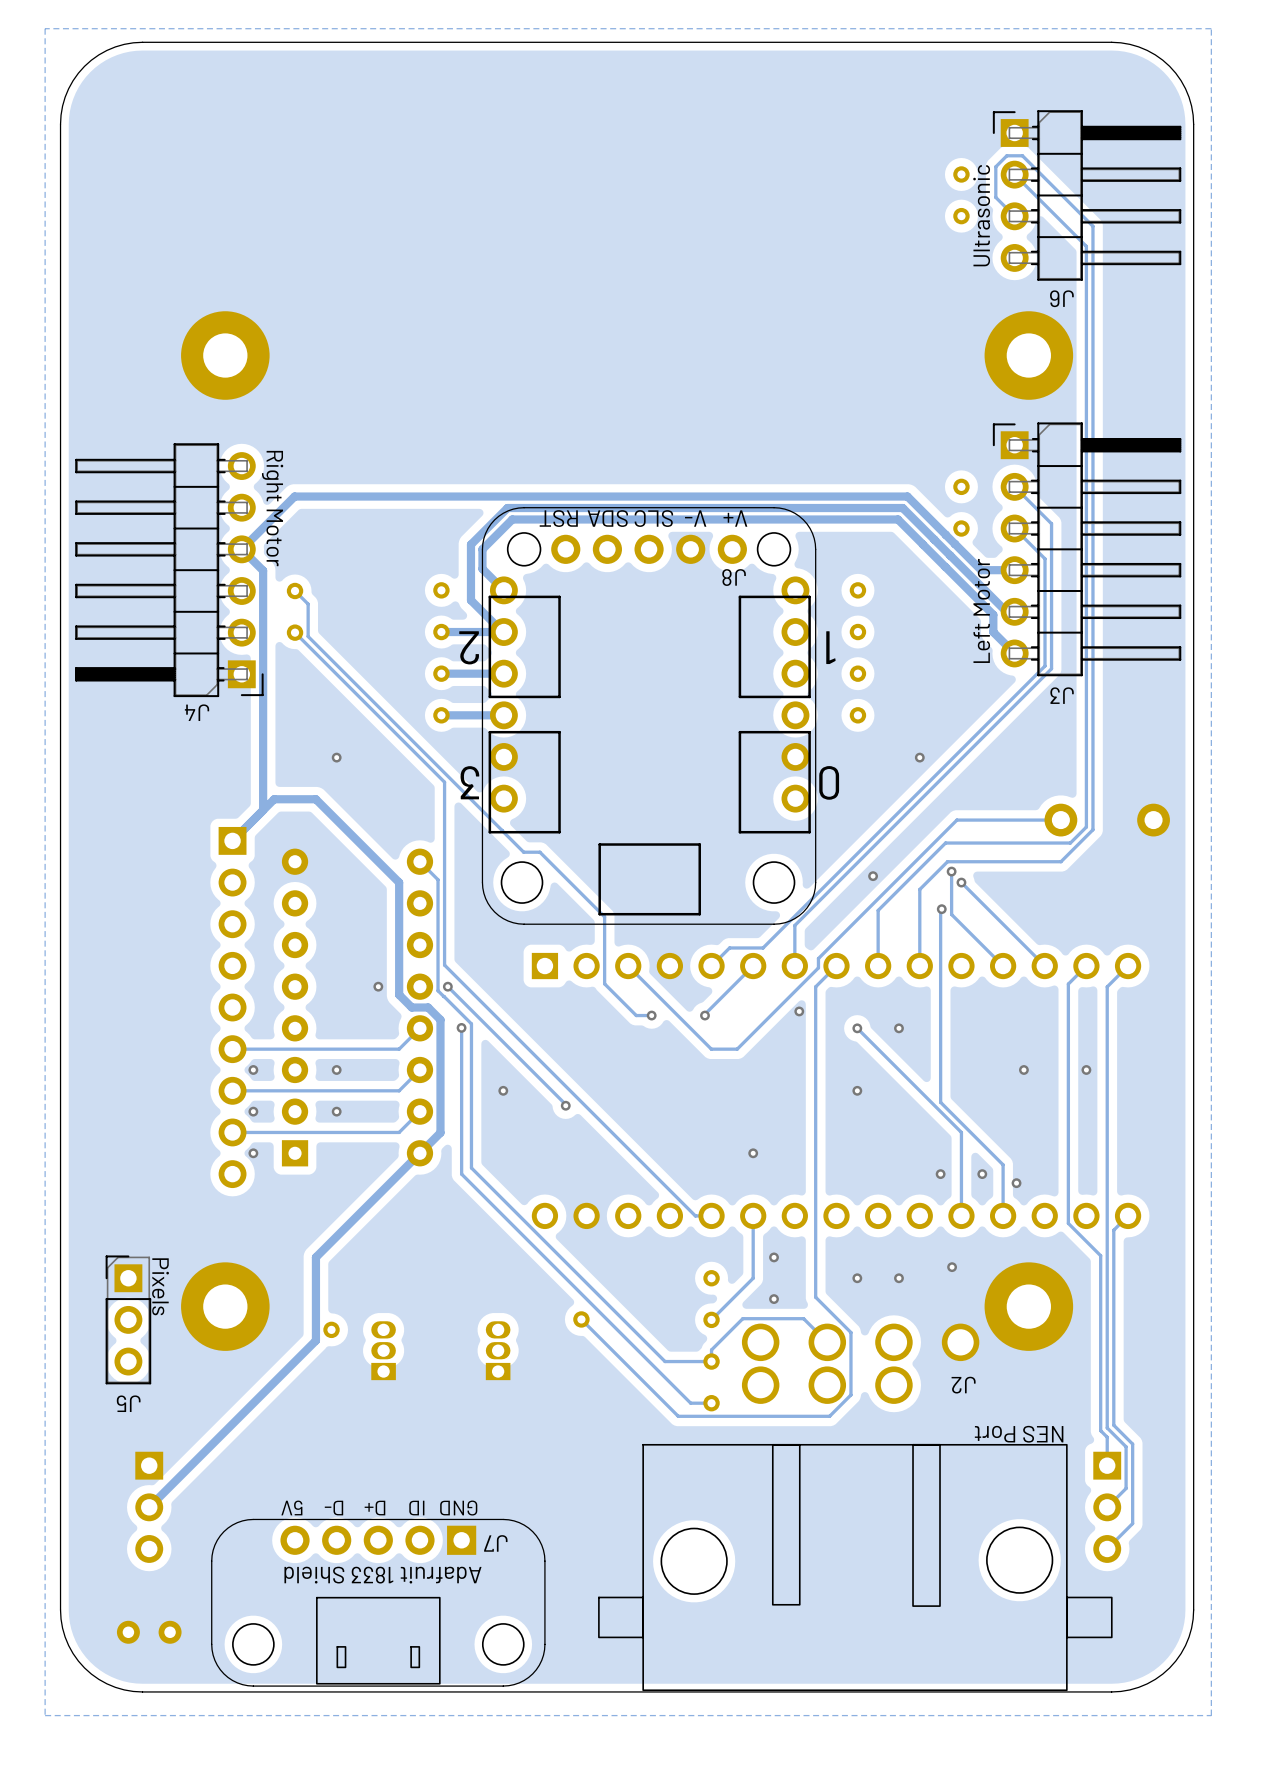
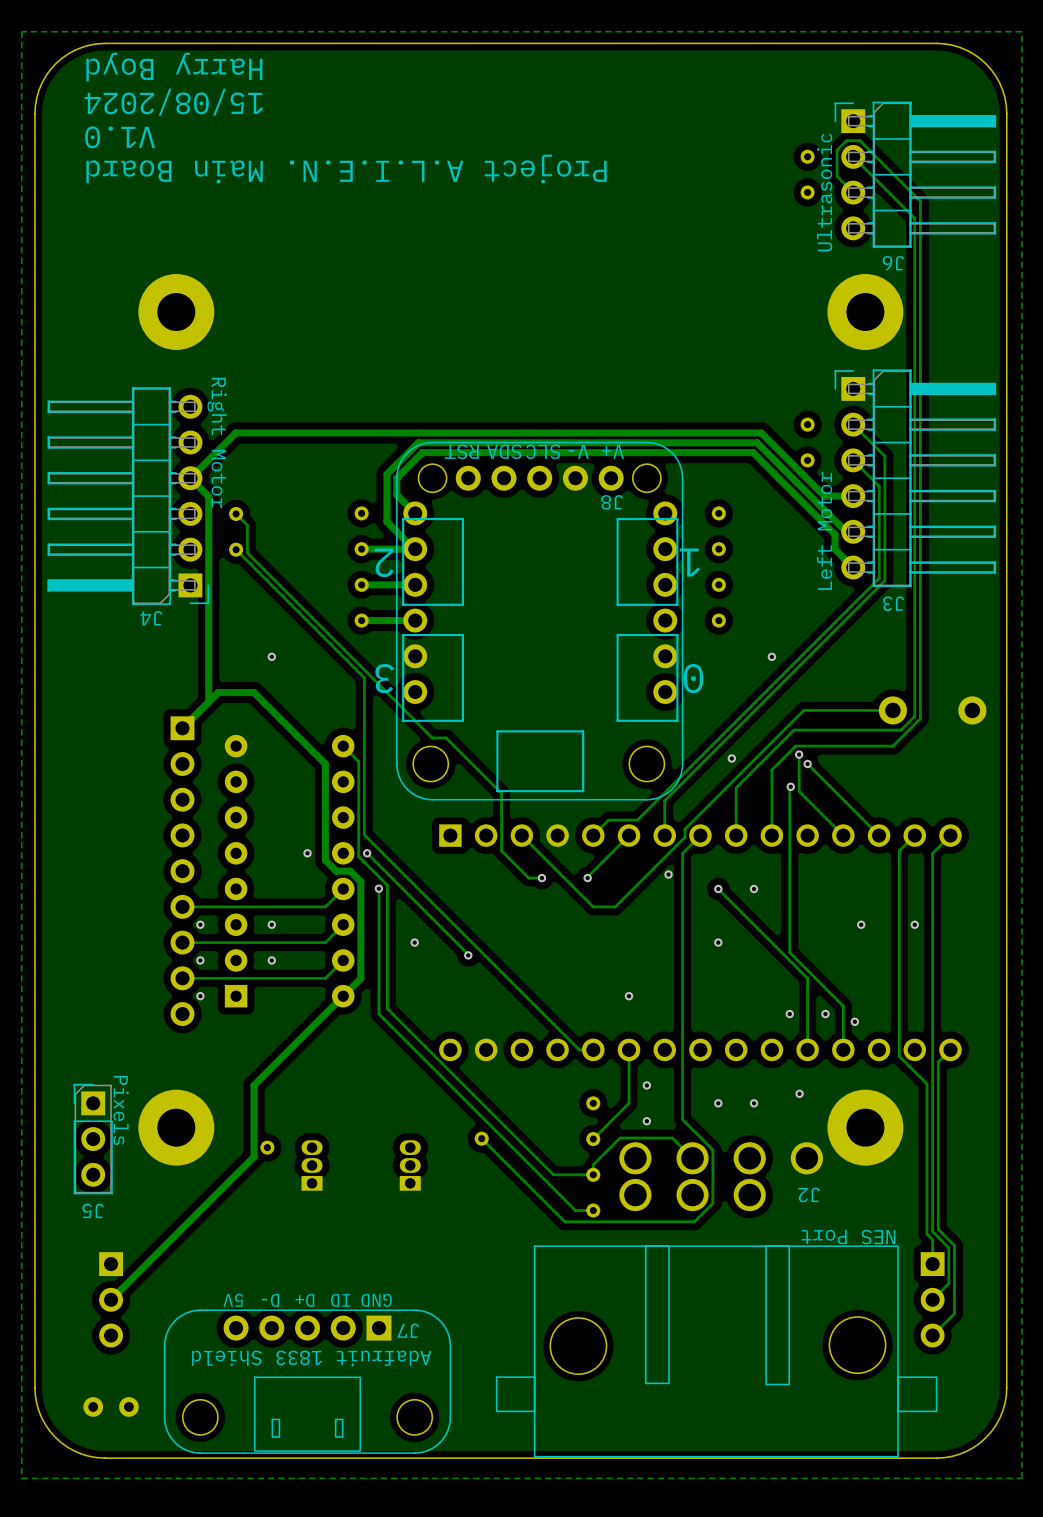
text: none -> Harry Boyd (174, 67)
text: none -> 15/08/2024 (173, 102)
text: none -> V1.0 (120, 137)
text: none -> Project A.L.I.E.N. Main Board (346, 169)

